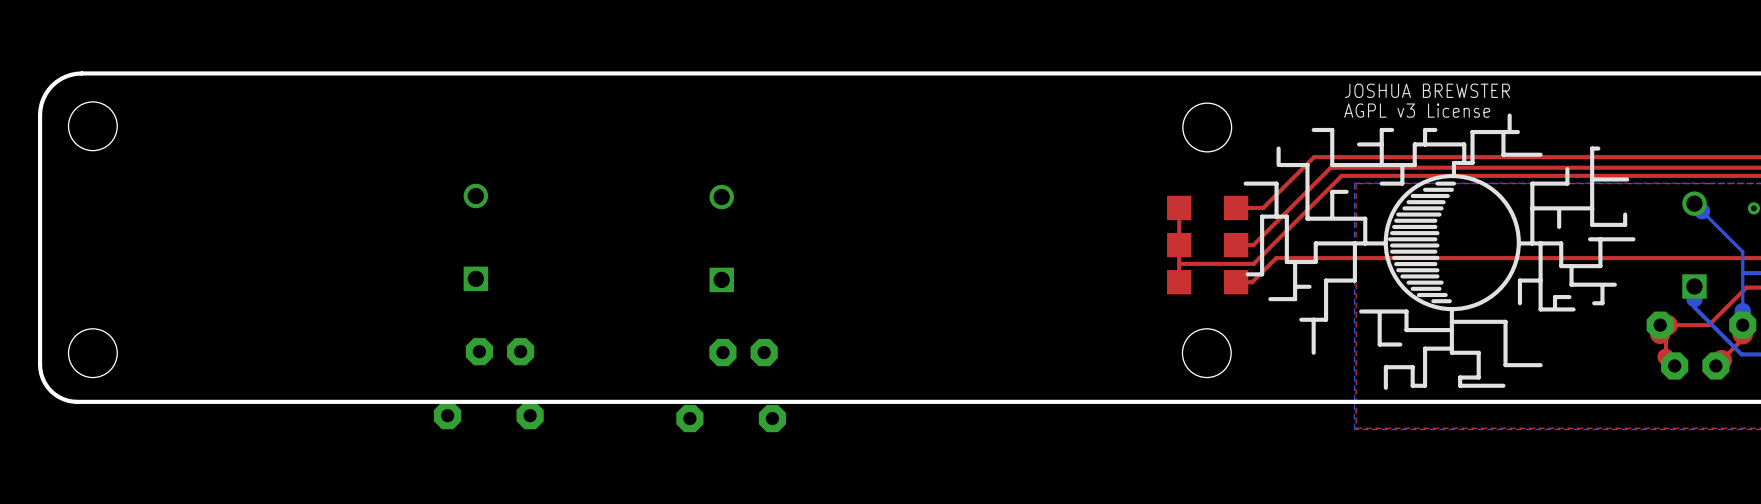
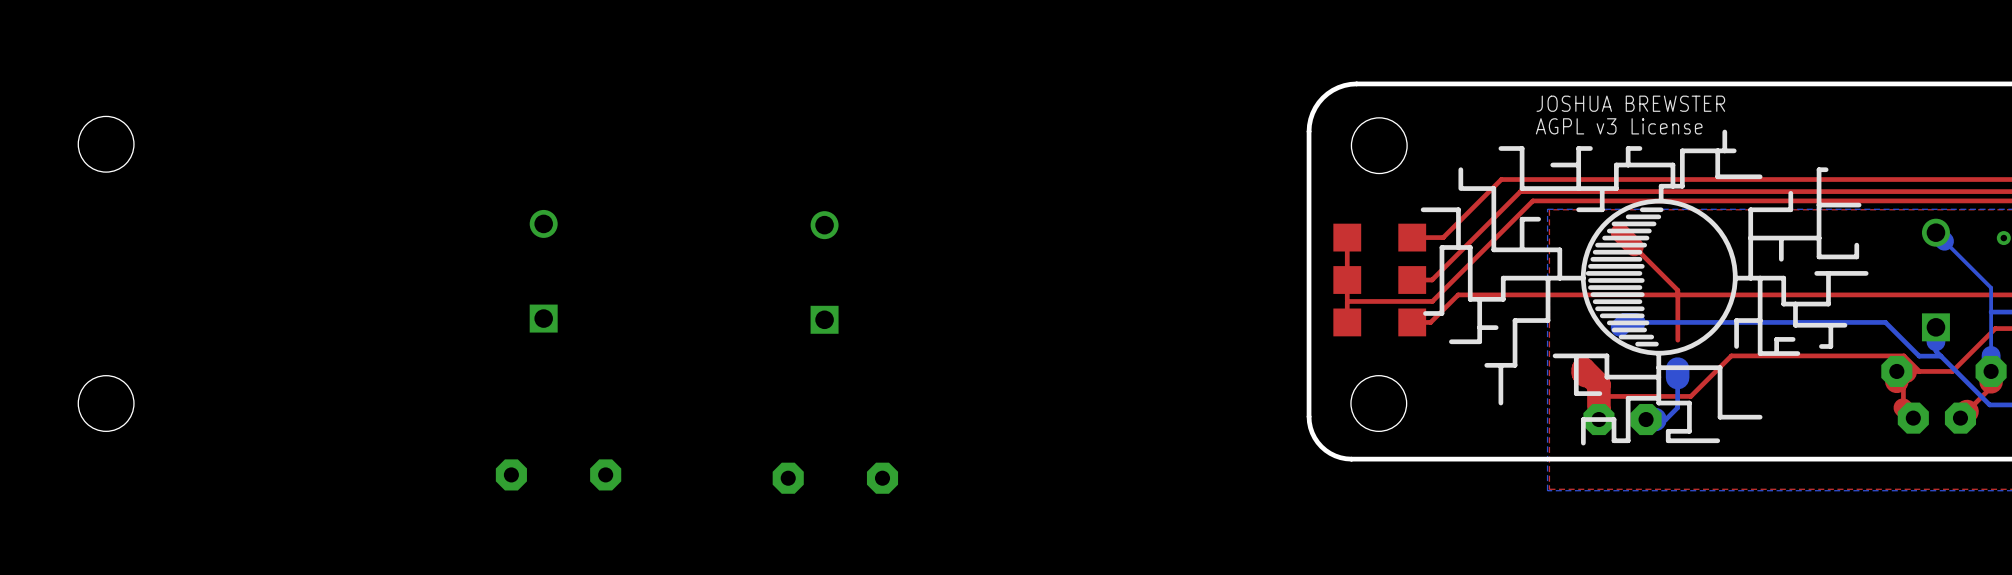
board edge: (1187, 73) (81, 73) (65, 76) (52, 85) (43, 99) (40, 115) (40, 369) (47, 387) (54, 394) (67, 400) (1182, 401) -> (1356, 83) (1338, 87) (1322, 97) (1312, 113) (1309, 131) (1309, 422) (1314, 437) (1325, 450) (1335, 455) (1351, 459)
top track: none -> (1620, 232) (1677, 290) (1677, 340)
bottom track: none -> (1620, 327) (1625, 322) (1885, 322) (1919, 356) (1940, 356)
bottom track: none -> (1677, 369) (1677, 407) (1665, 419) (1646, 419)
top track: none -> (1919, 371) (1903, 355) (1731, 355) (1690, 396) (1606, 396) (1585, 375) (1583, 373) (1583, 369) (1598, 384) (1598, 406) (1601, 409) (1601, 417) (1598, 419)
part: (500, 351) -> none
part: (743, 352) -> none
part: none -> (1622, 419)

